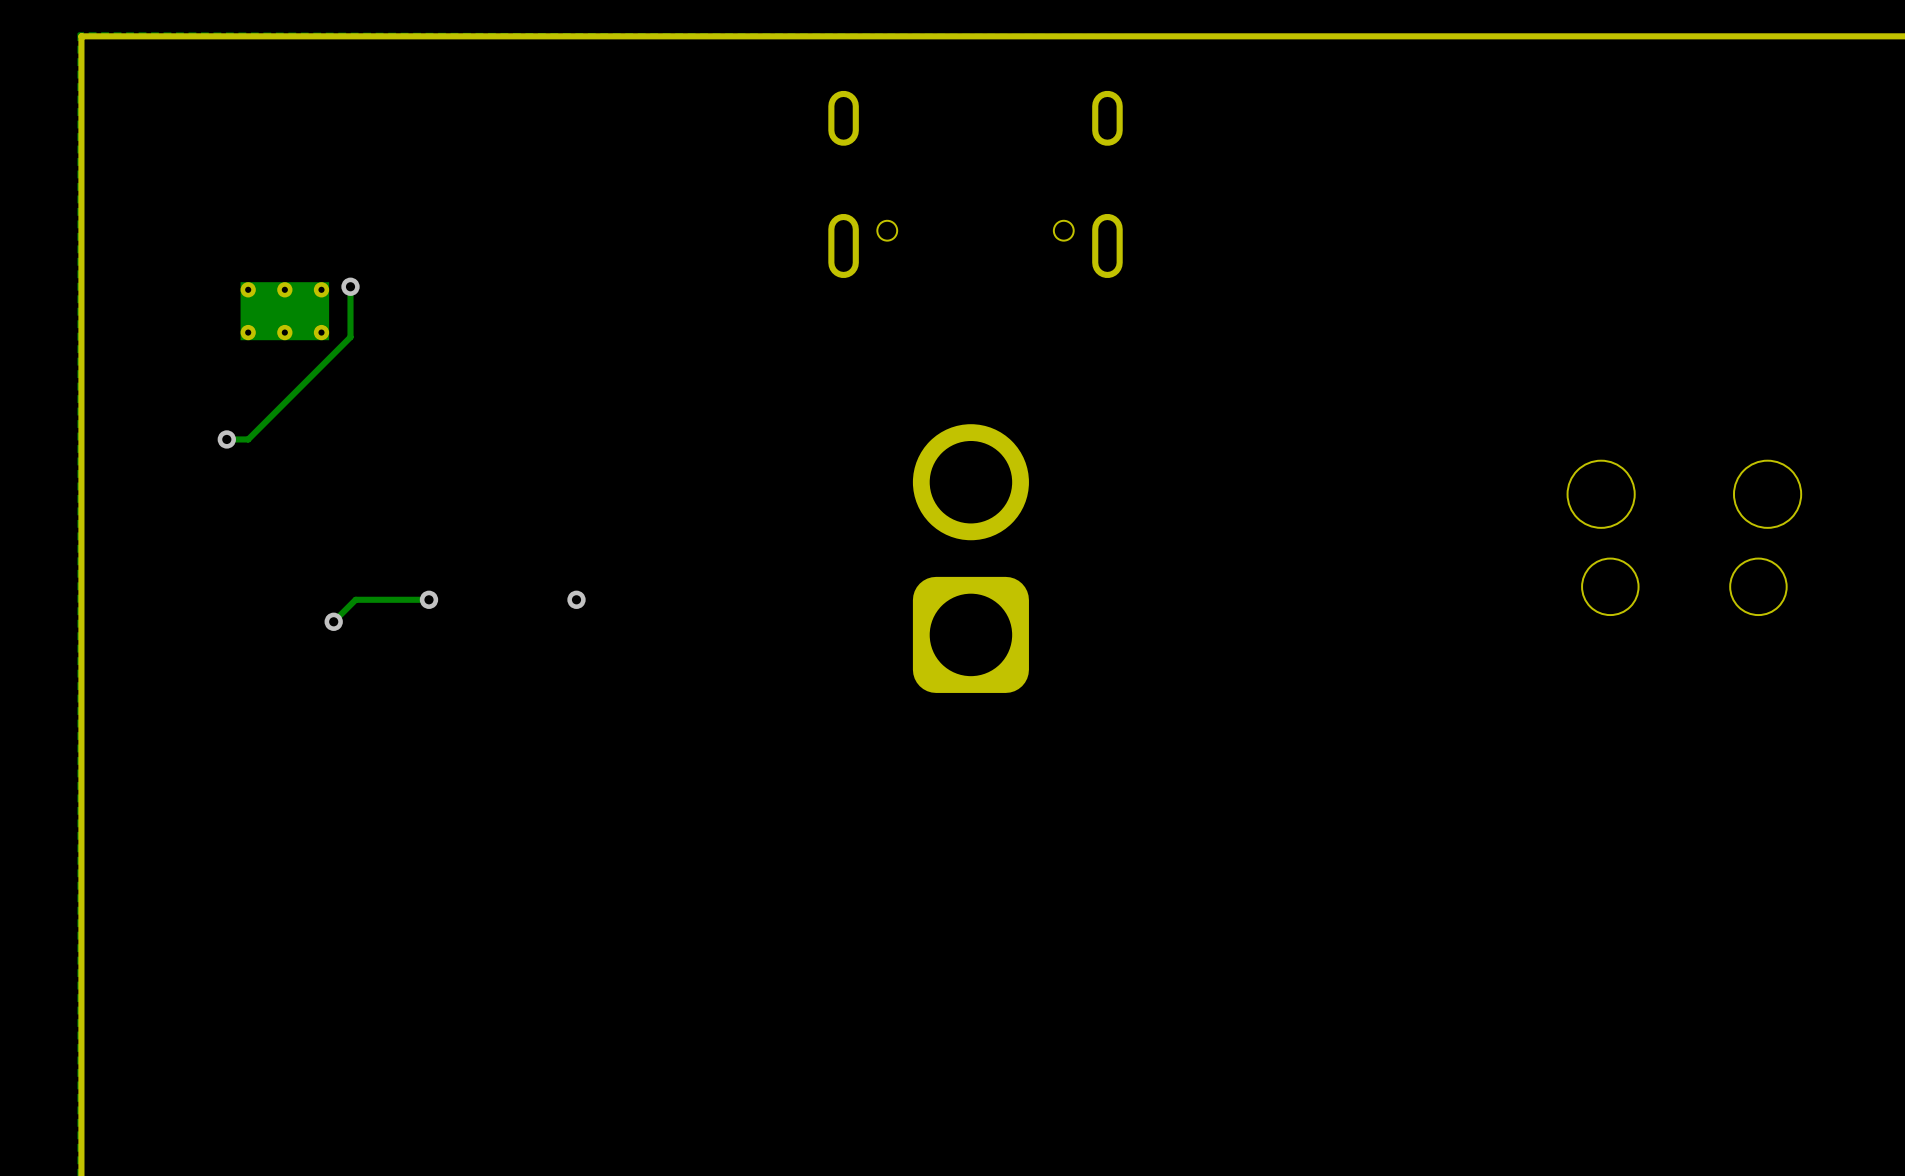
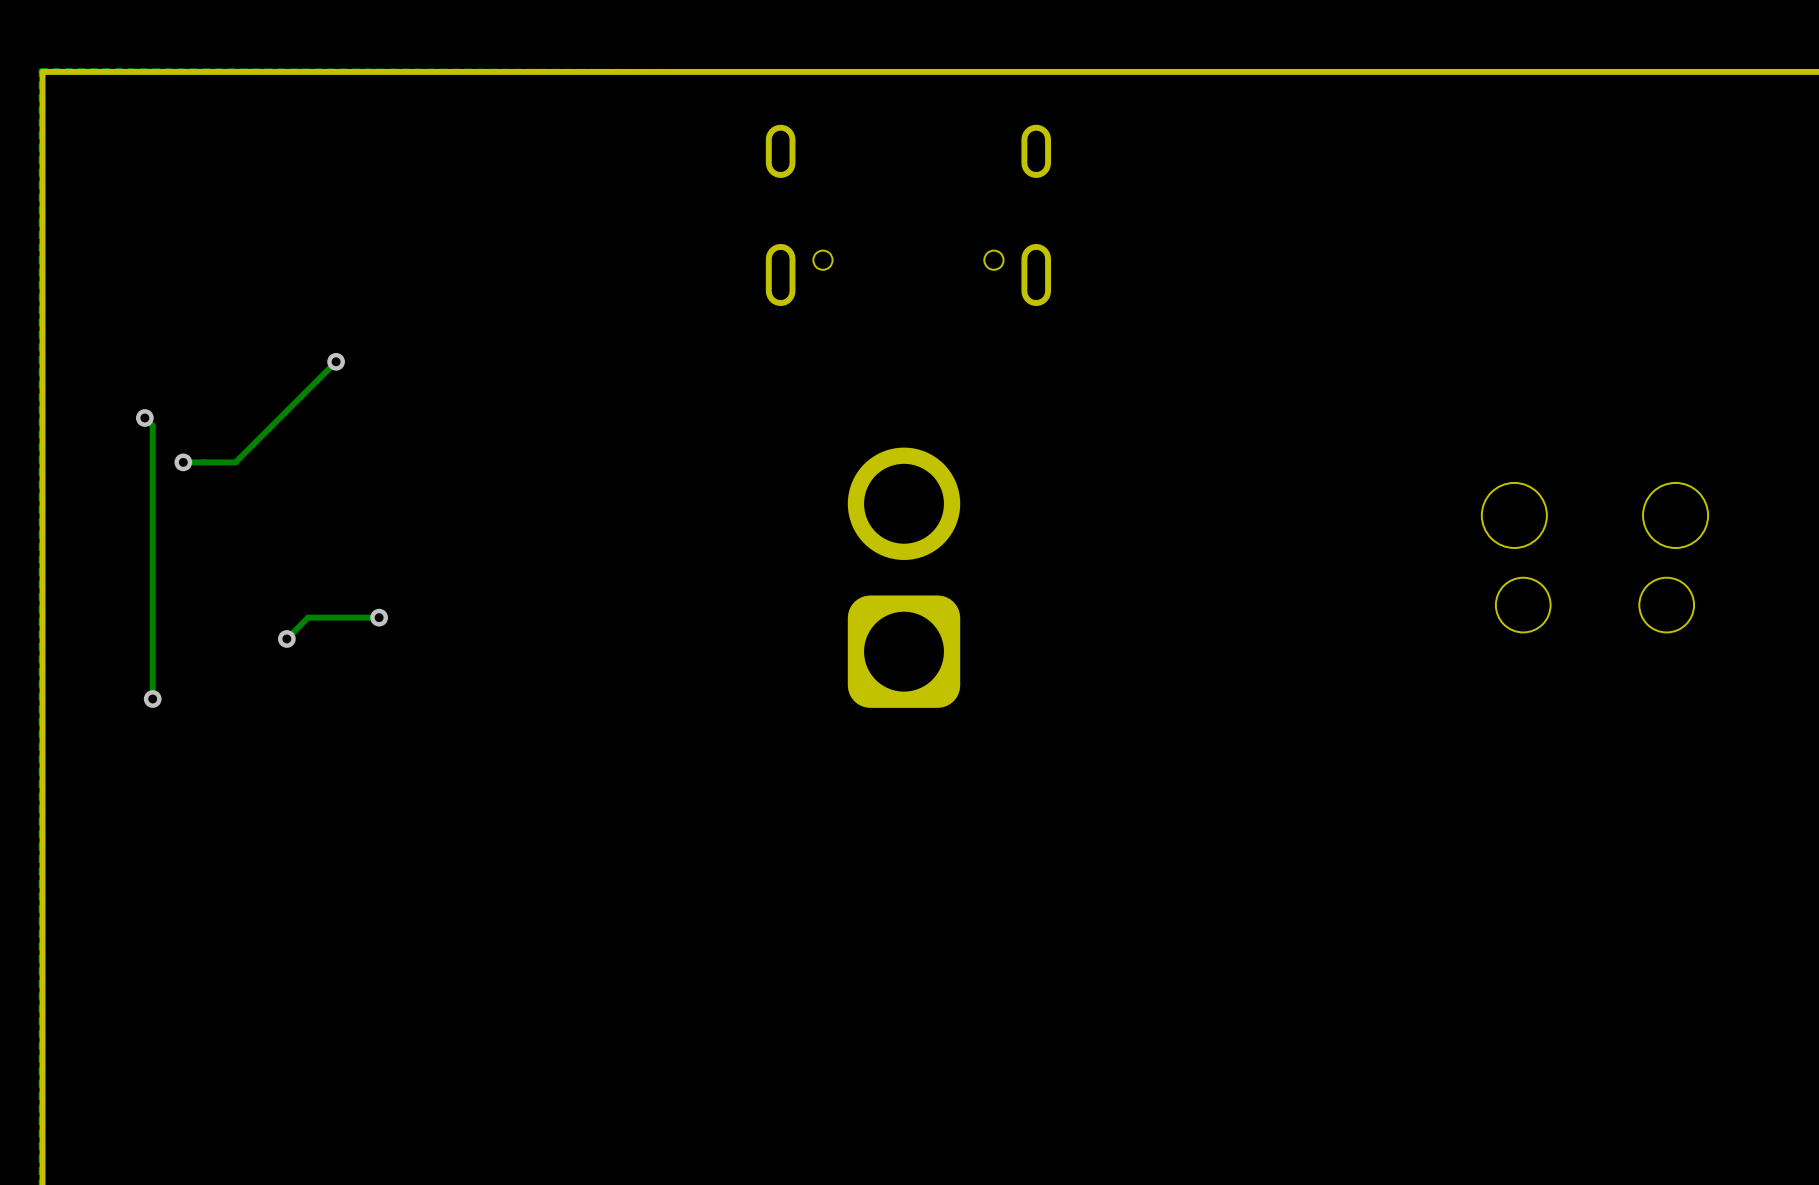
track: (350, 286) (350, 337) (248, 439) -> (336, 361) (235, 462) (204, 462)
via position: (350, 286) -> (336, 361)
part: (284, 311) -> none
track: none -> (144, 418) (152, 425) (152, 698)
via: none -> (144, 418)
via: (576, 599) -> none
via: none -> (152, 698)

